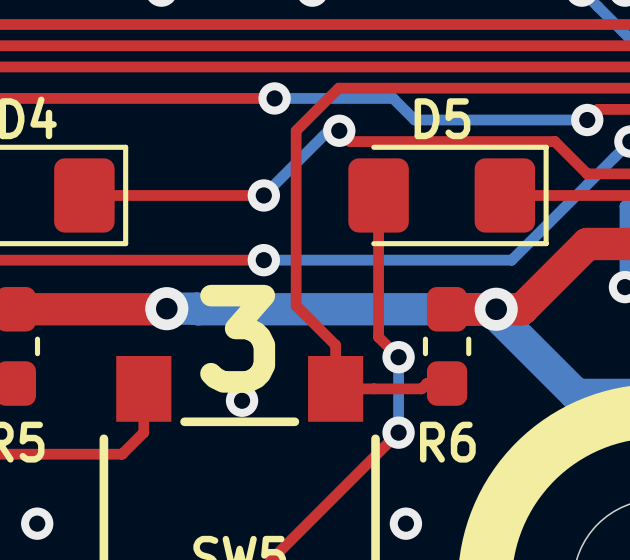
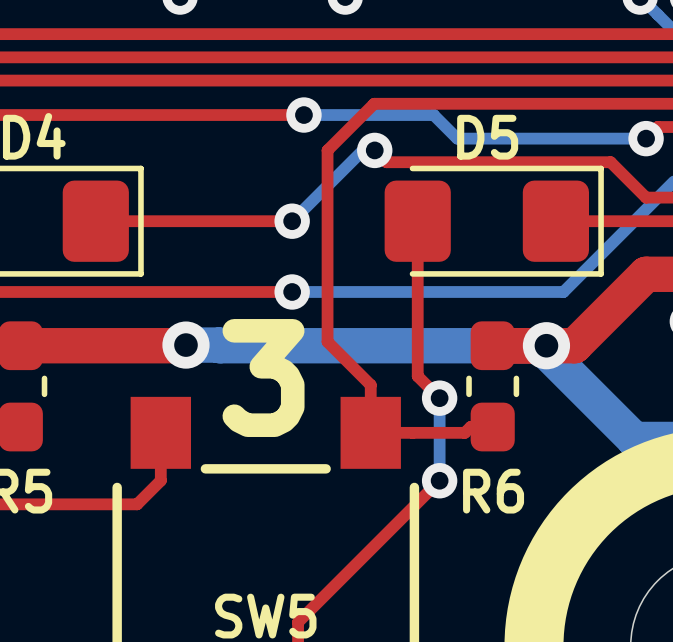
via: (242, 400) -> none
via: (37, 523) -> none
via: (405, 523) -> none

